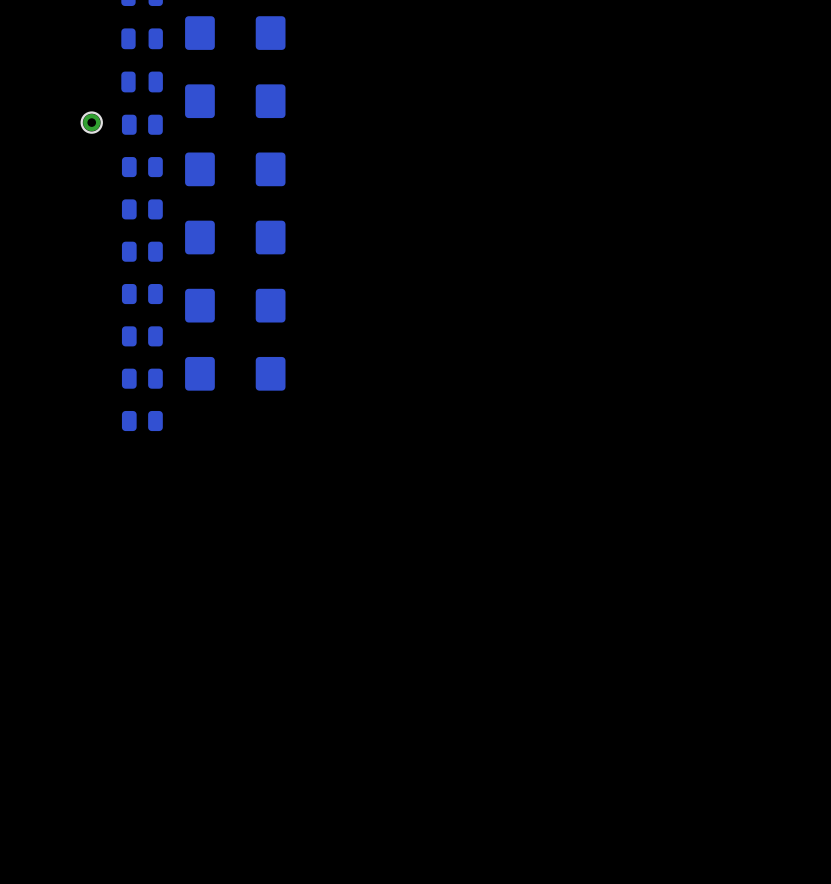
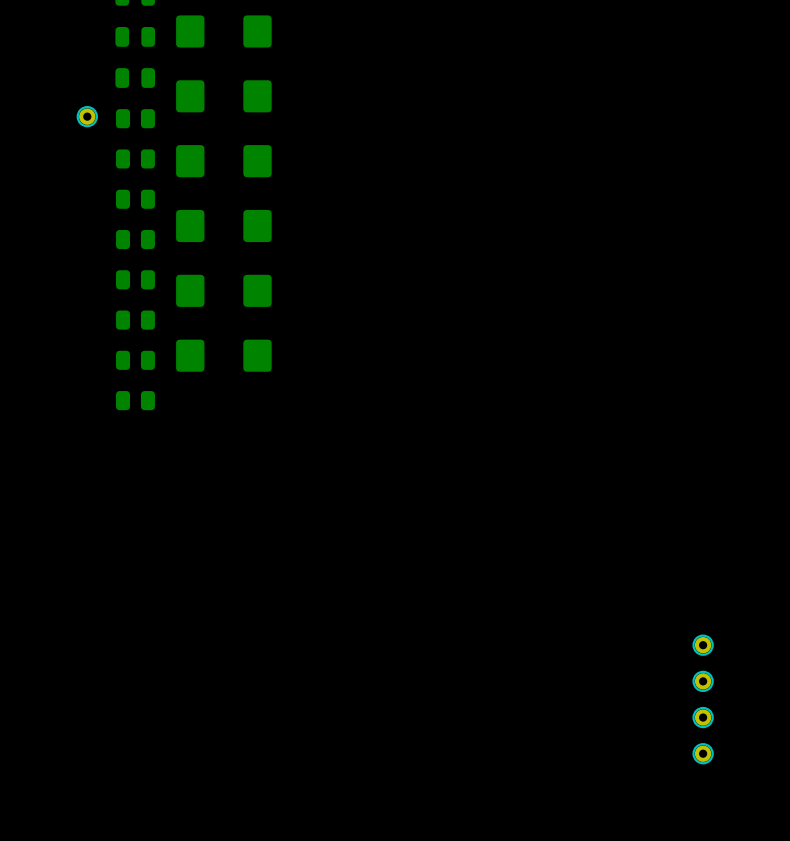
part: none -> (703, 645)
part: none -> (703, 681)
part: none -> (703, 717)
part: none -> (703, 753)

